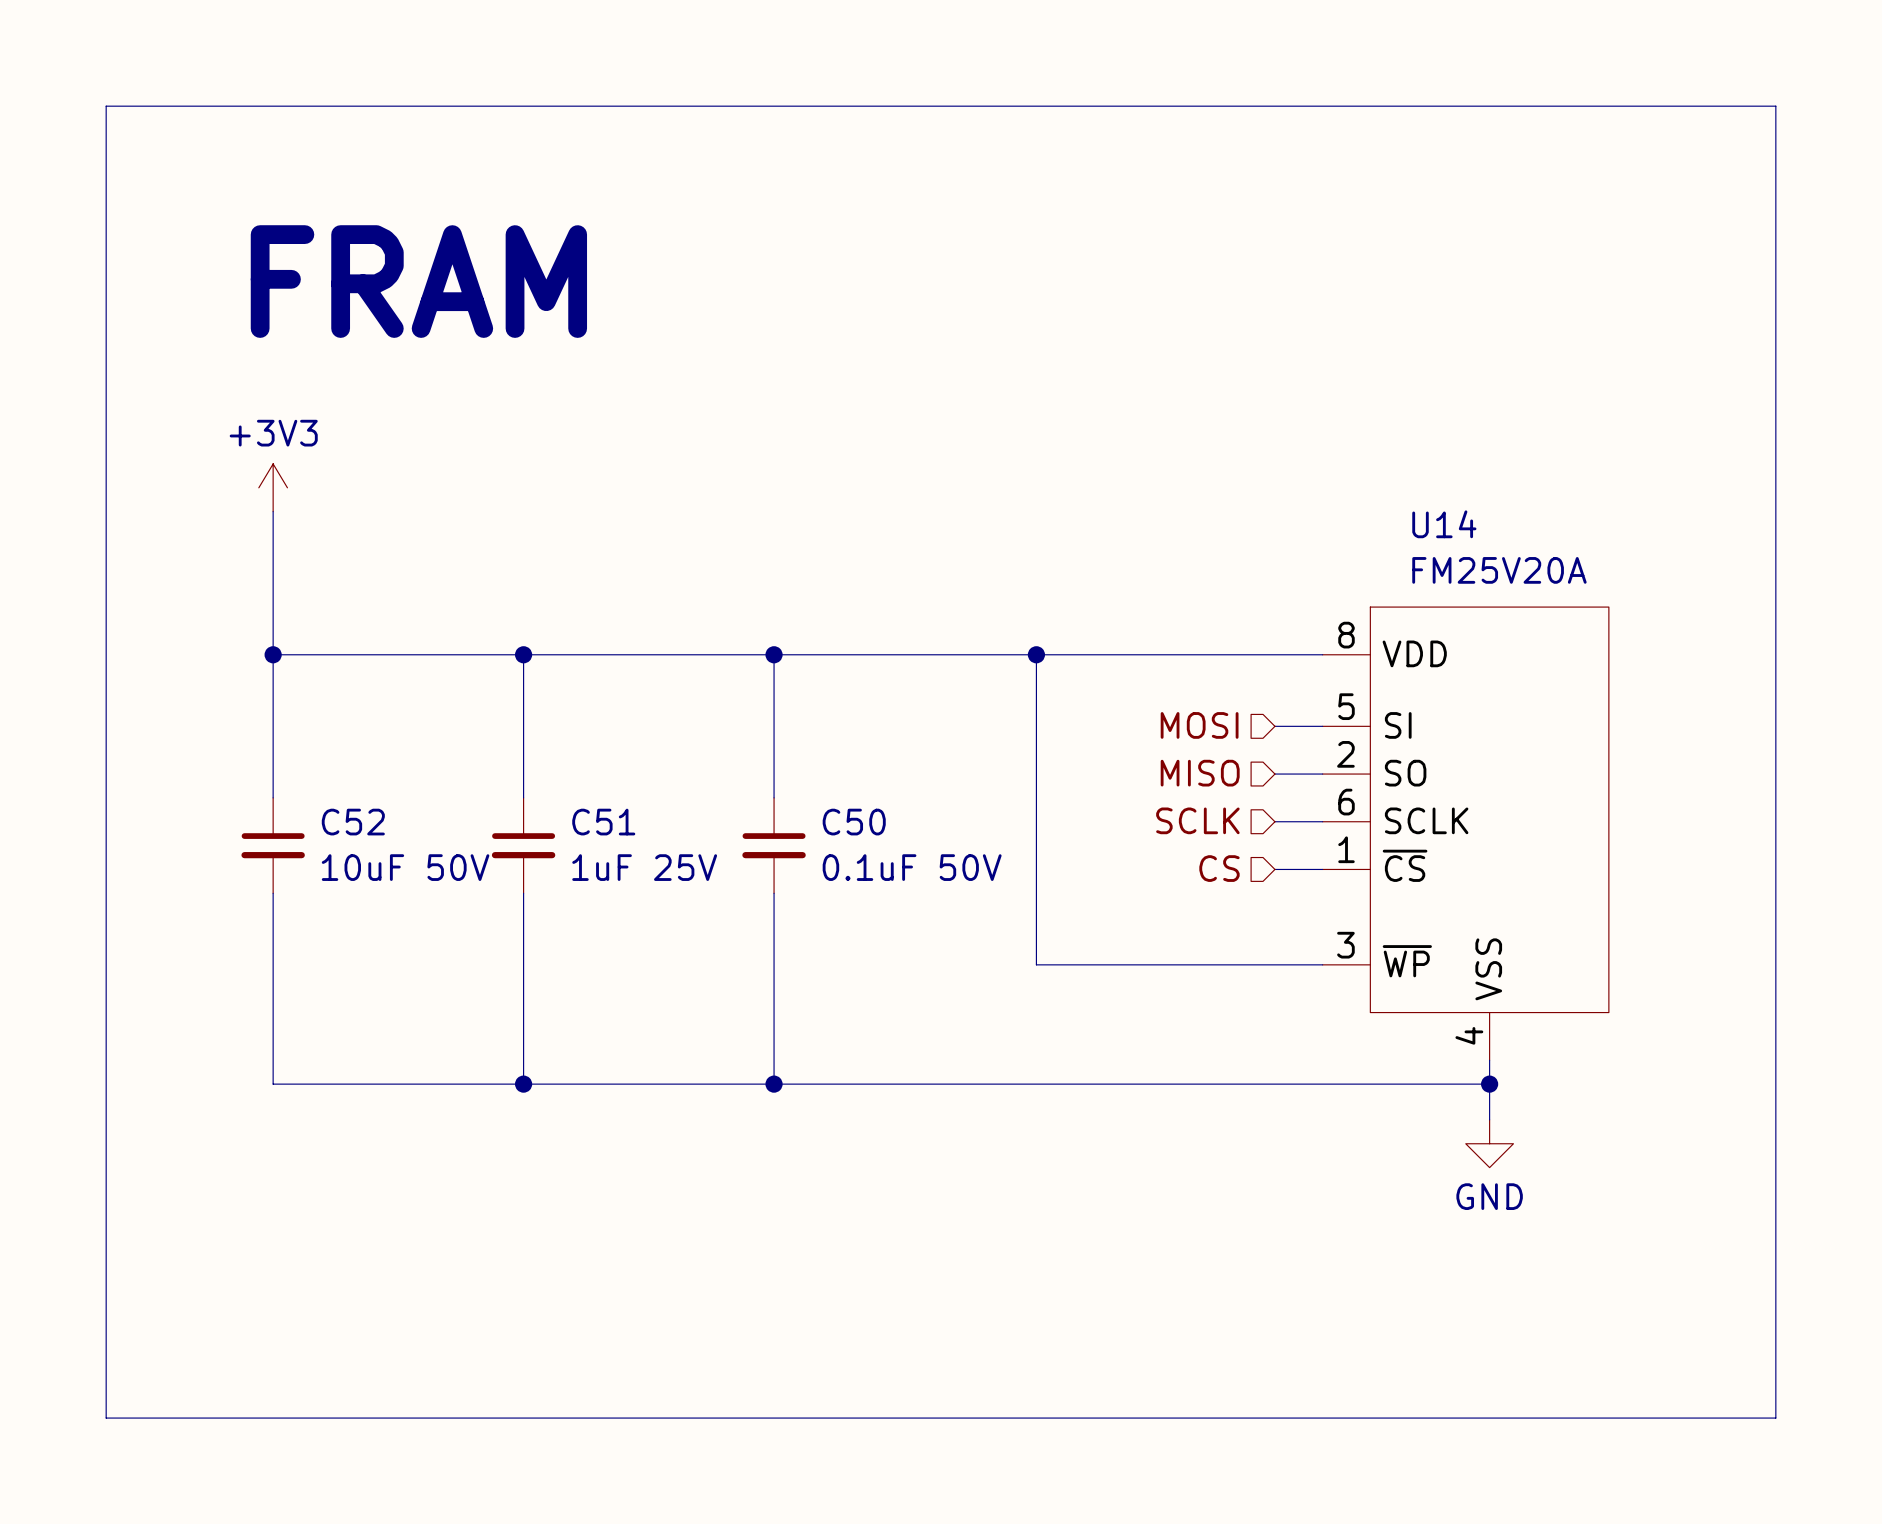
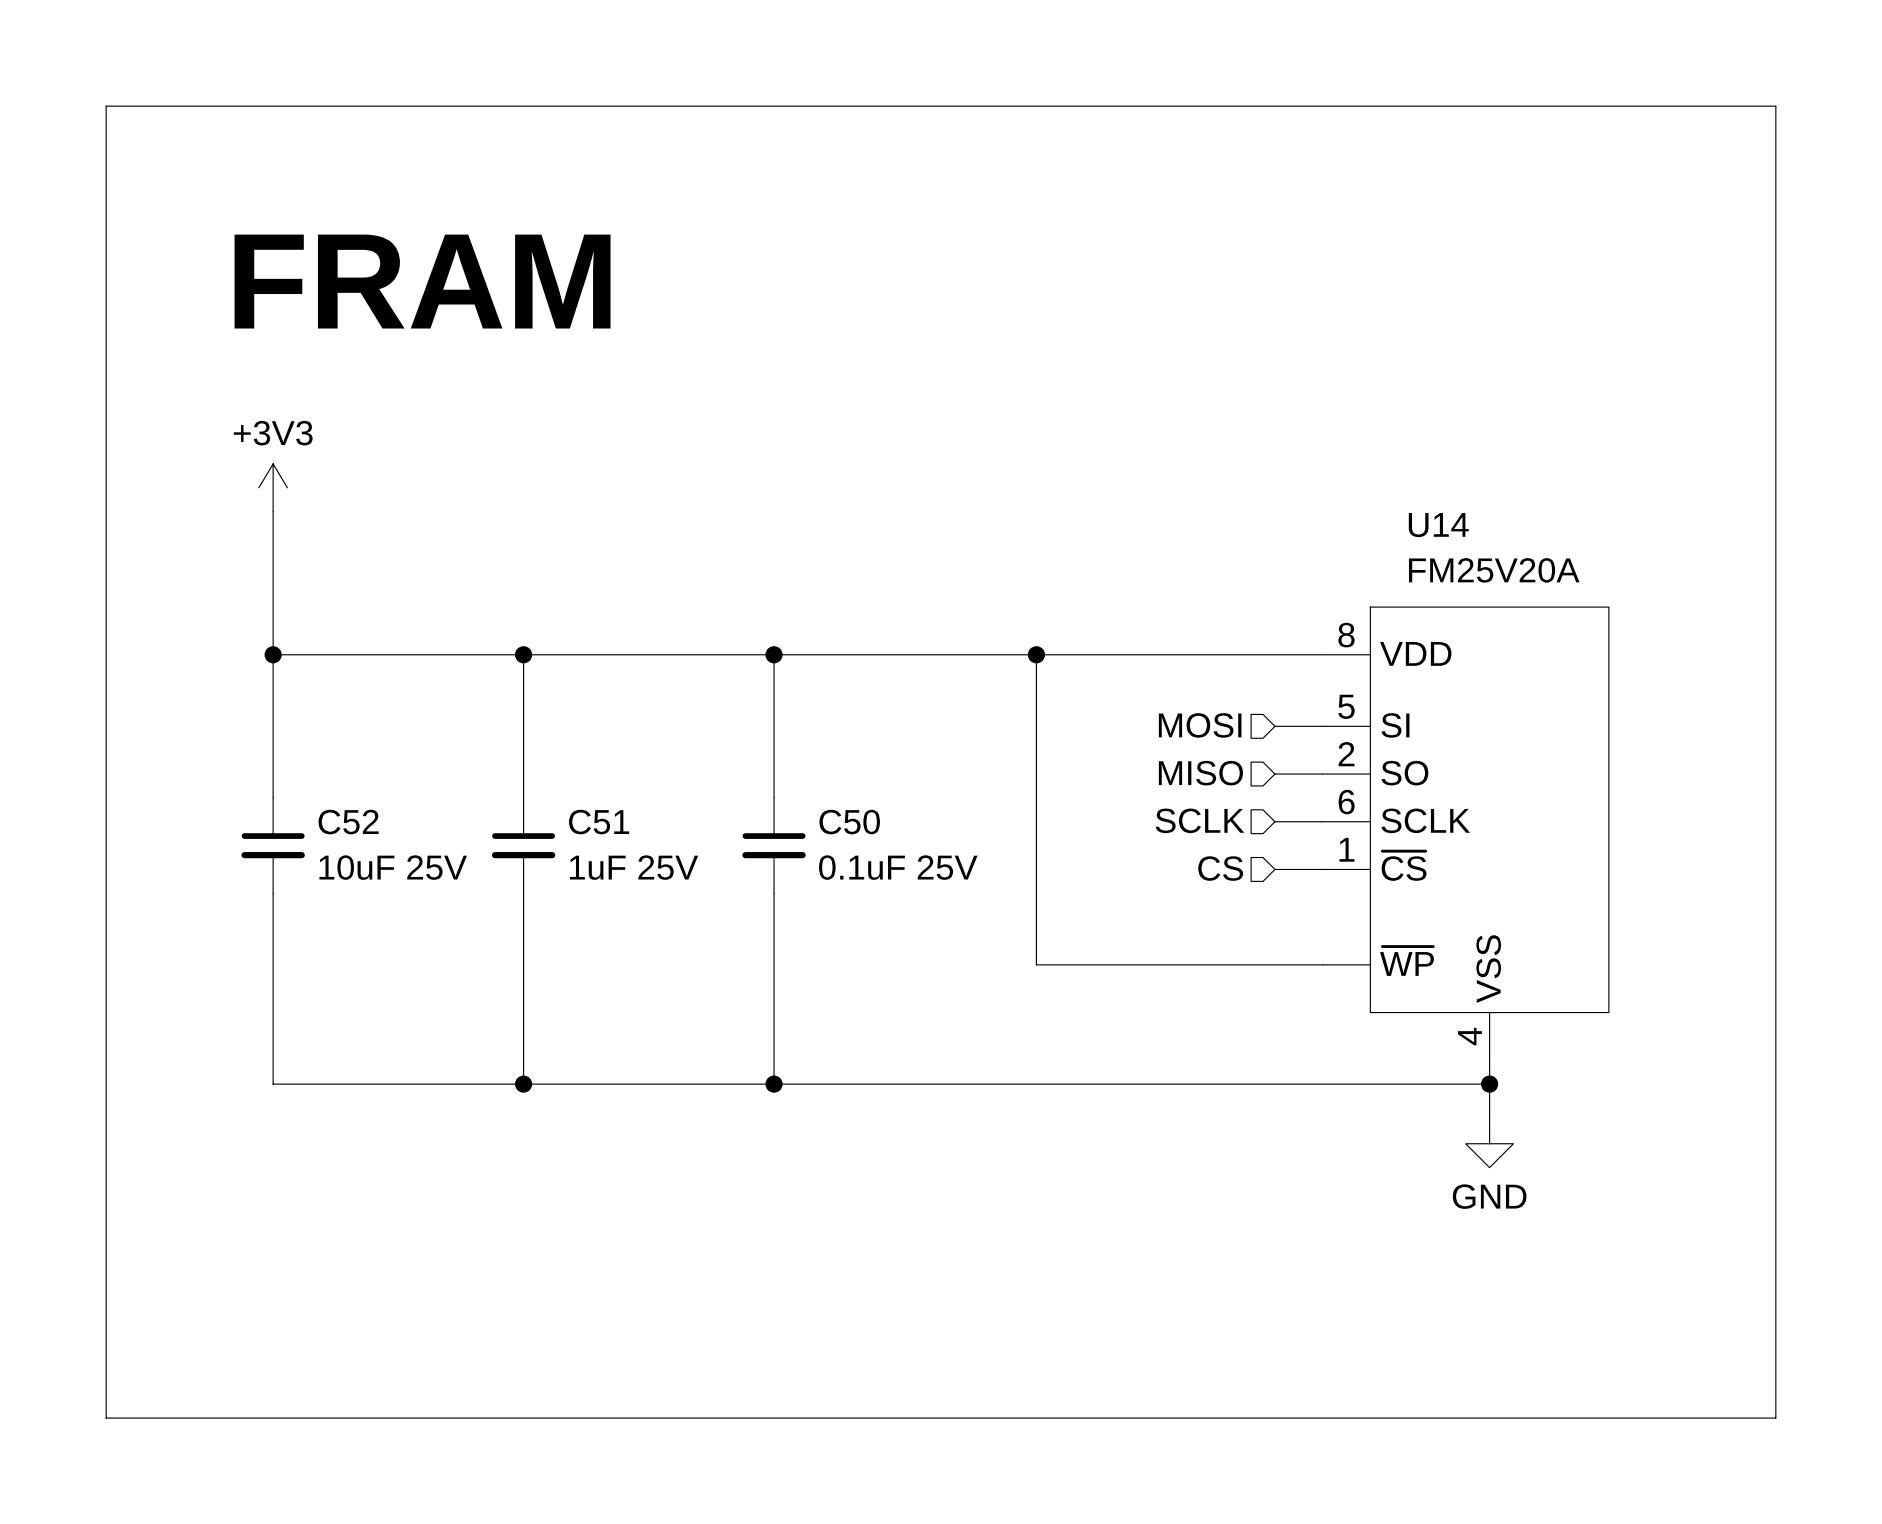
C52 value: 10uF 50V (405, 867) -> 10uF 25V (393, 867)
C50 value: 0.1uF 50V (912, 867) -> 0.1uF 25V (898, 867)
U14 pin number: 3 (1345, 945) -> none

